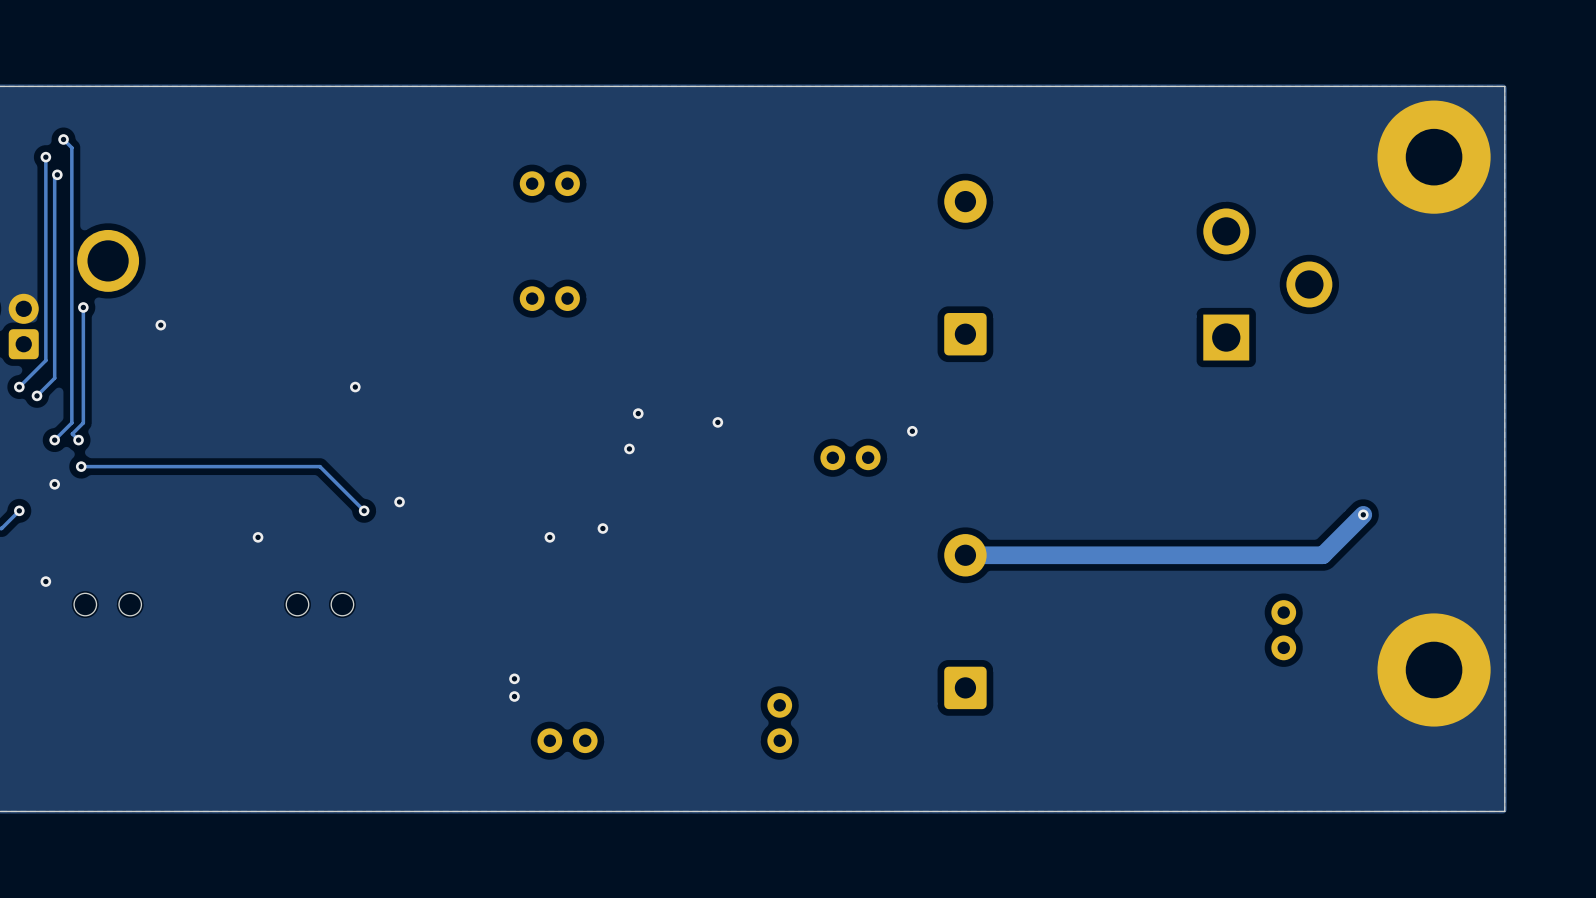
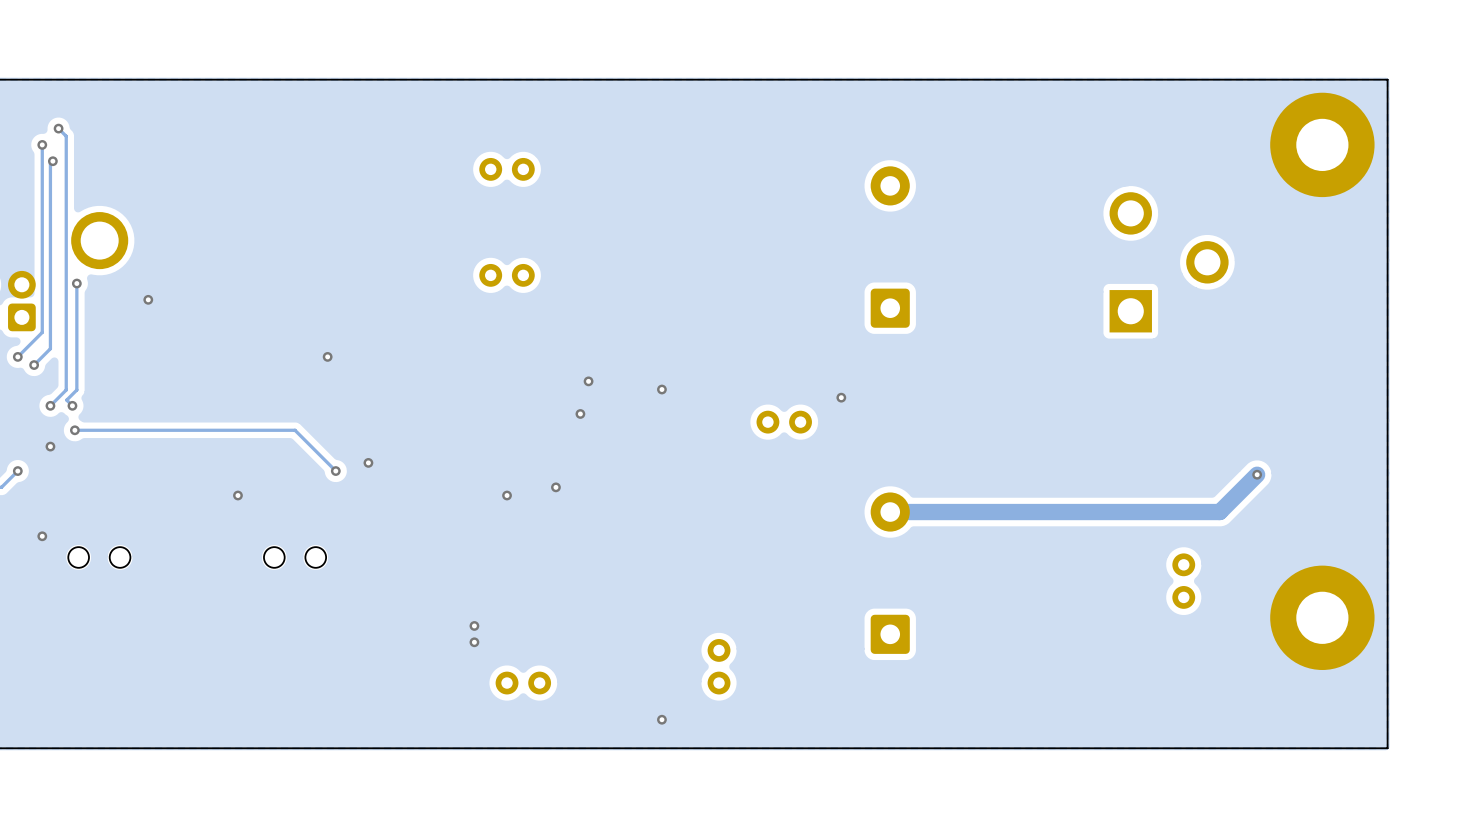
via: none -> (661, 719)

